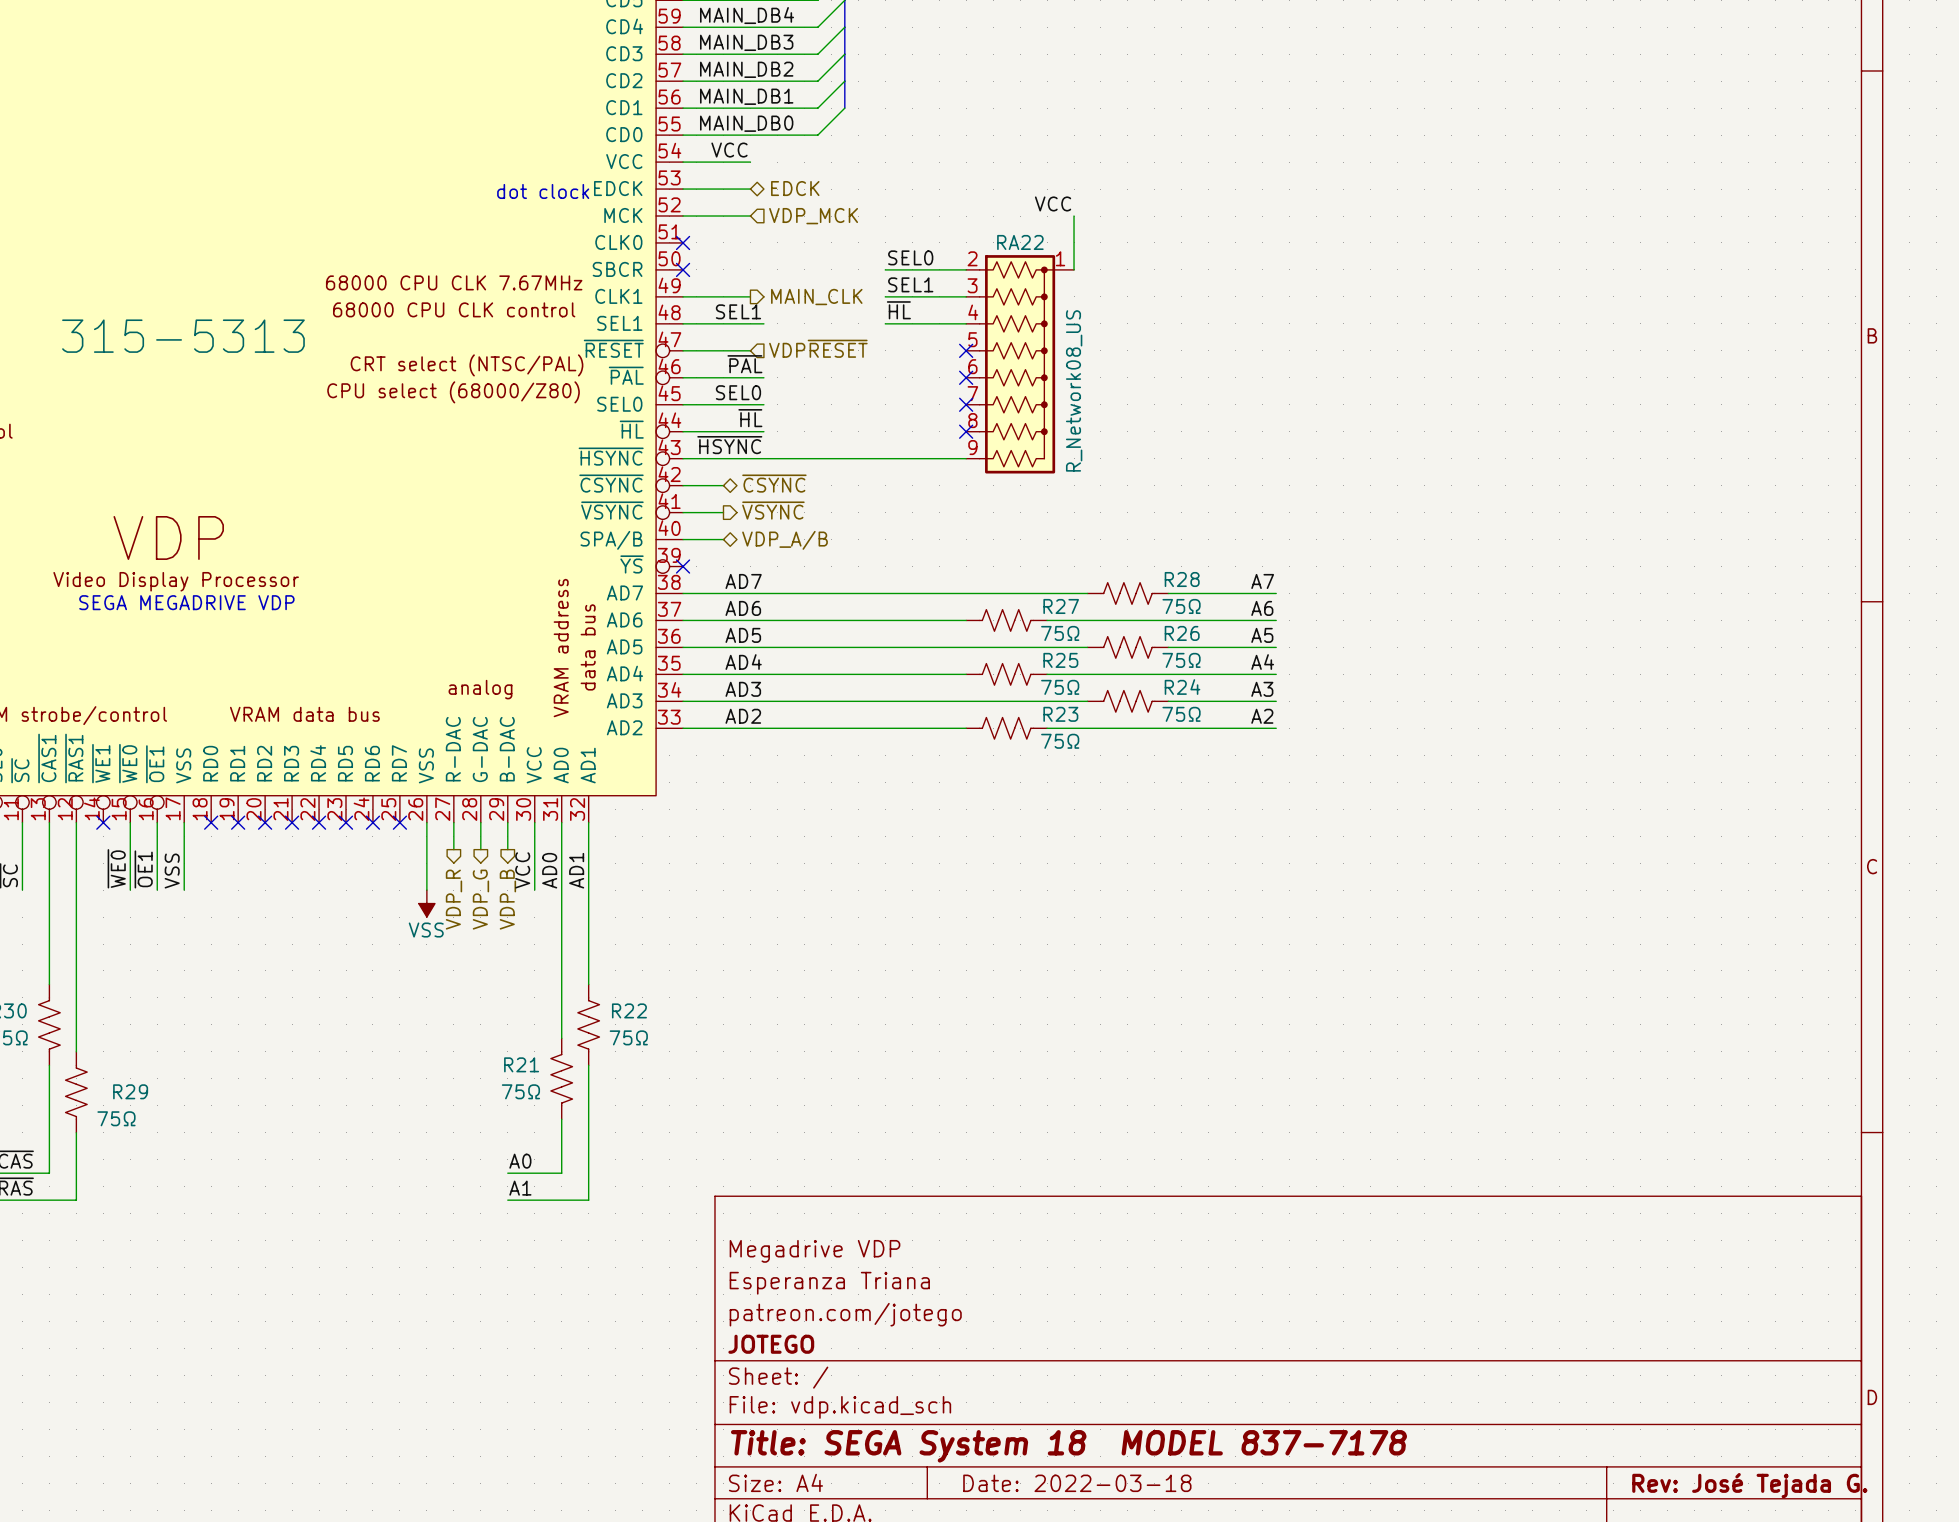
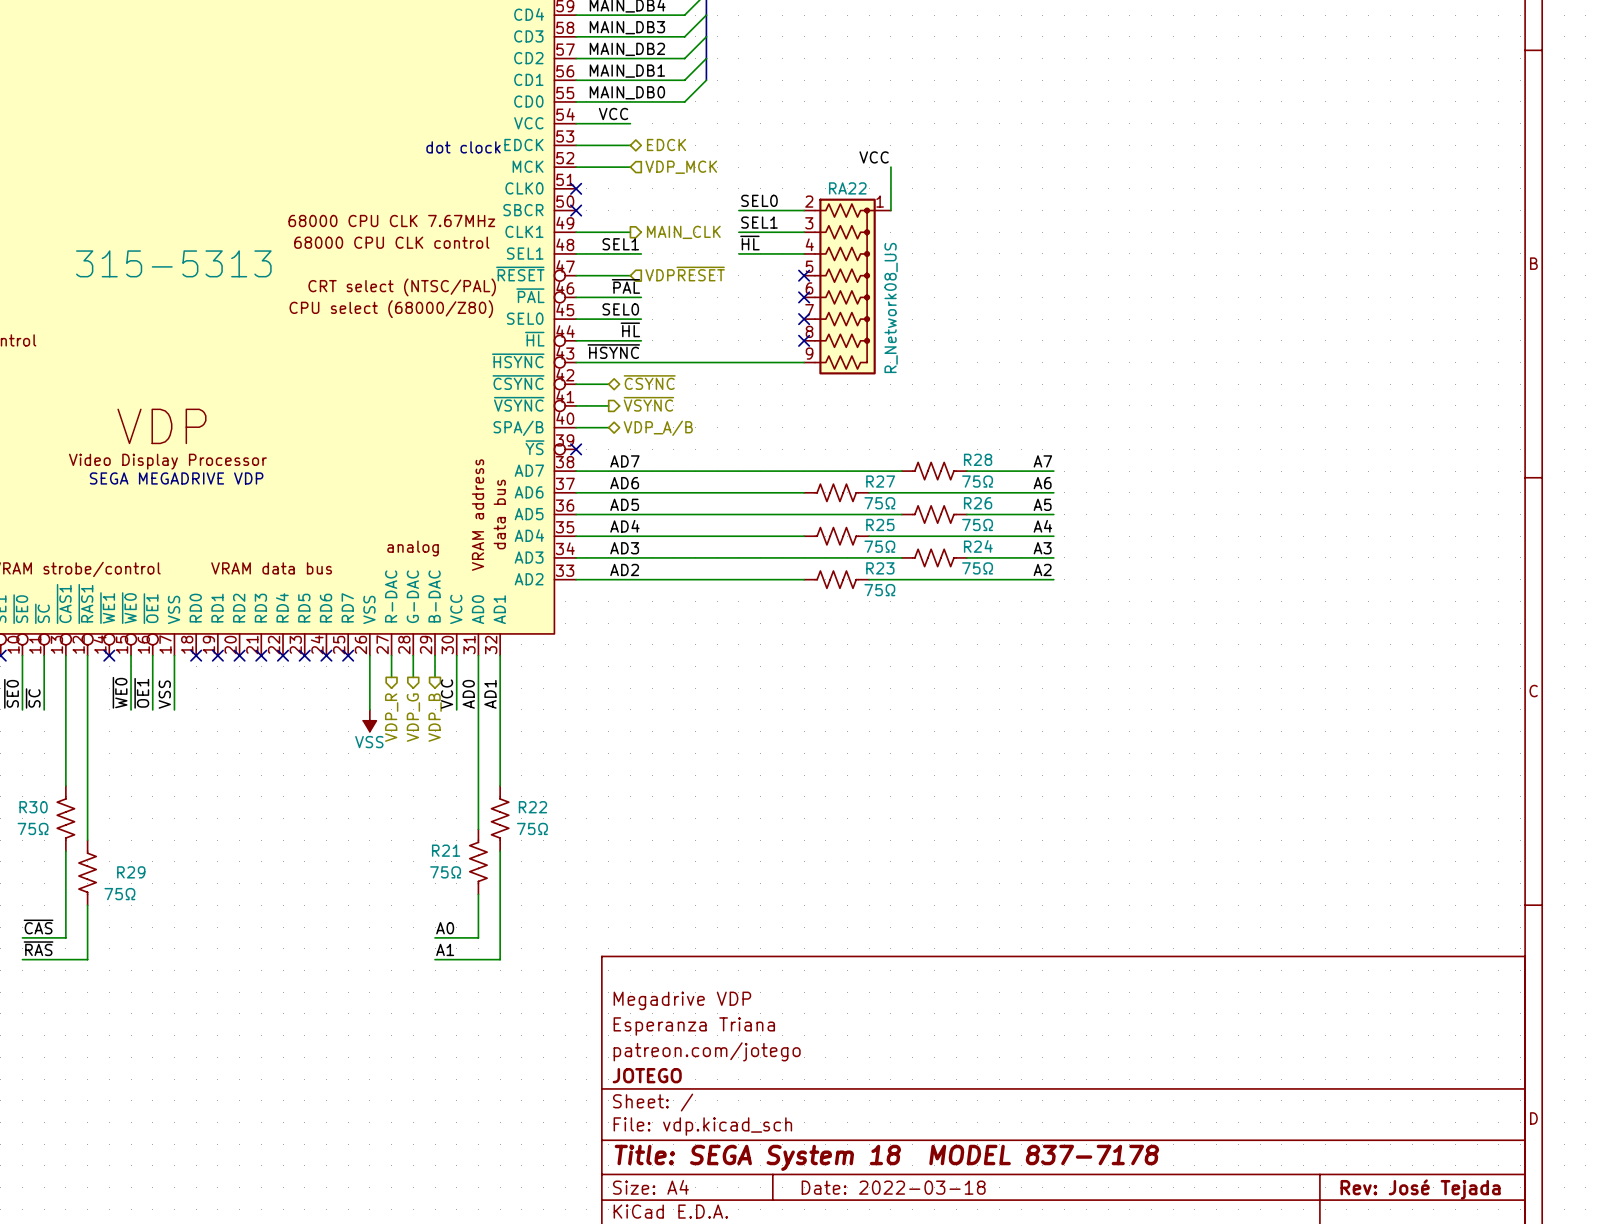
title block: Rev: José Tejada G. (1749, 1485) -> Rev: José Tejada (1420, 1189)

